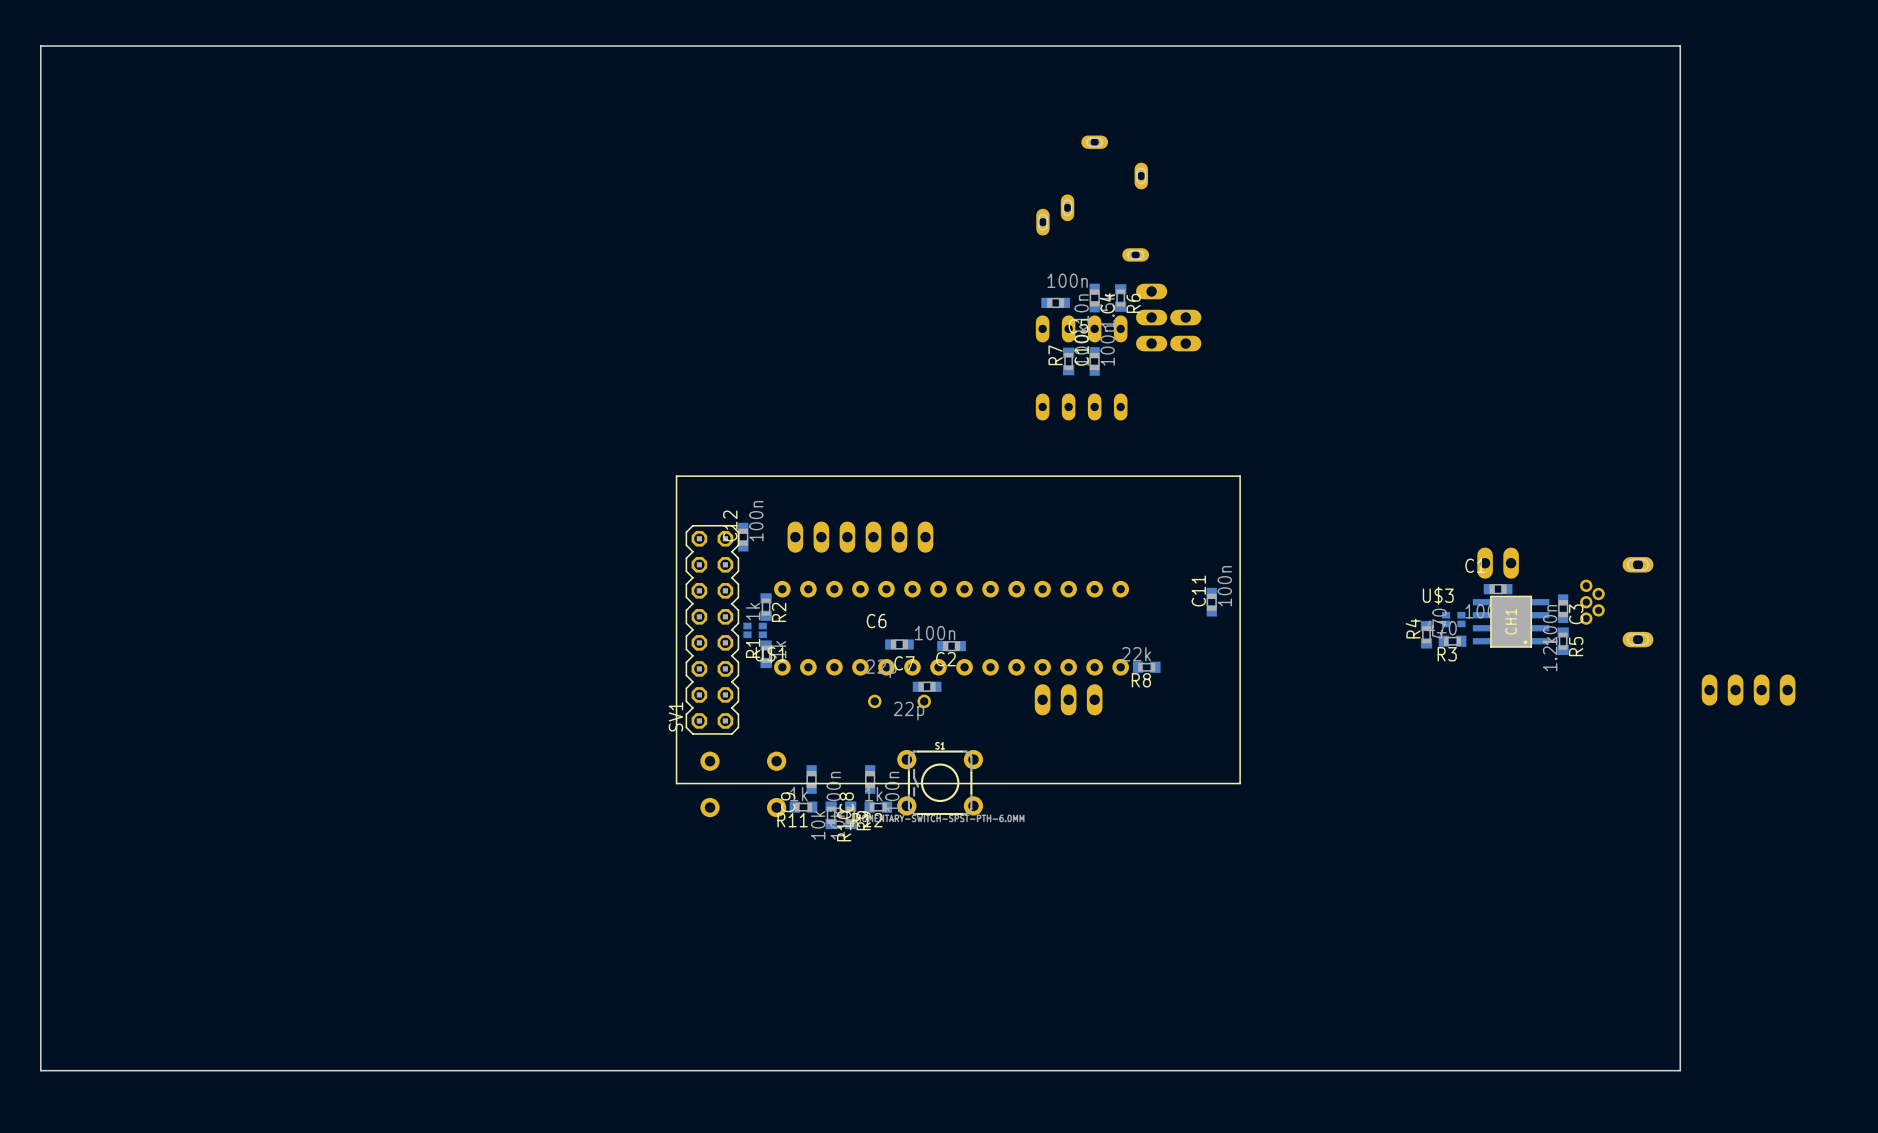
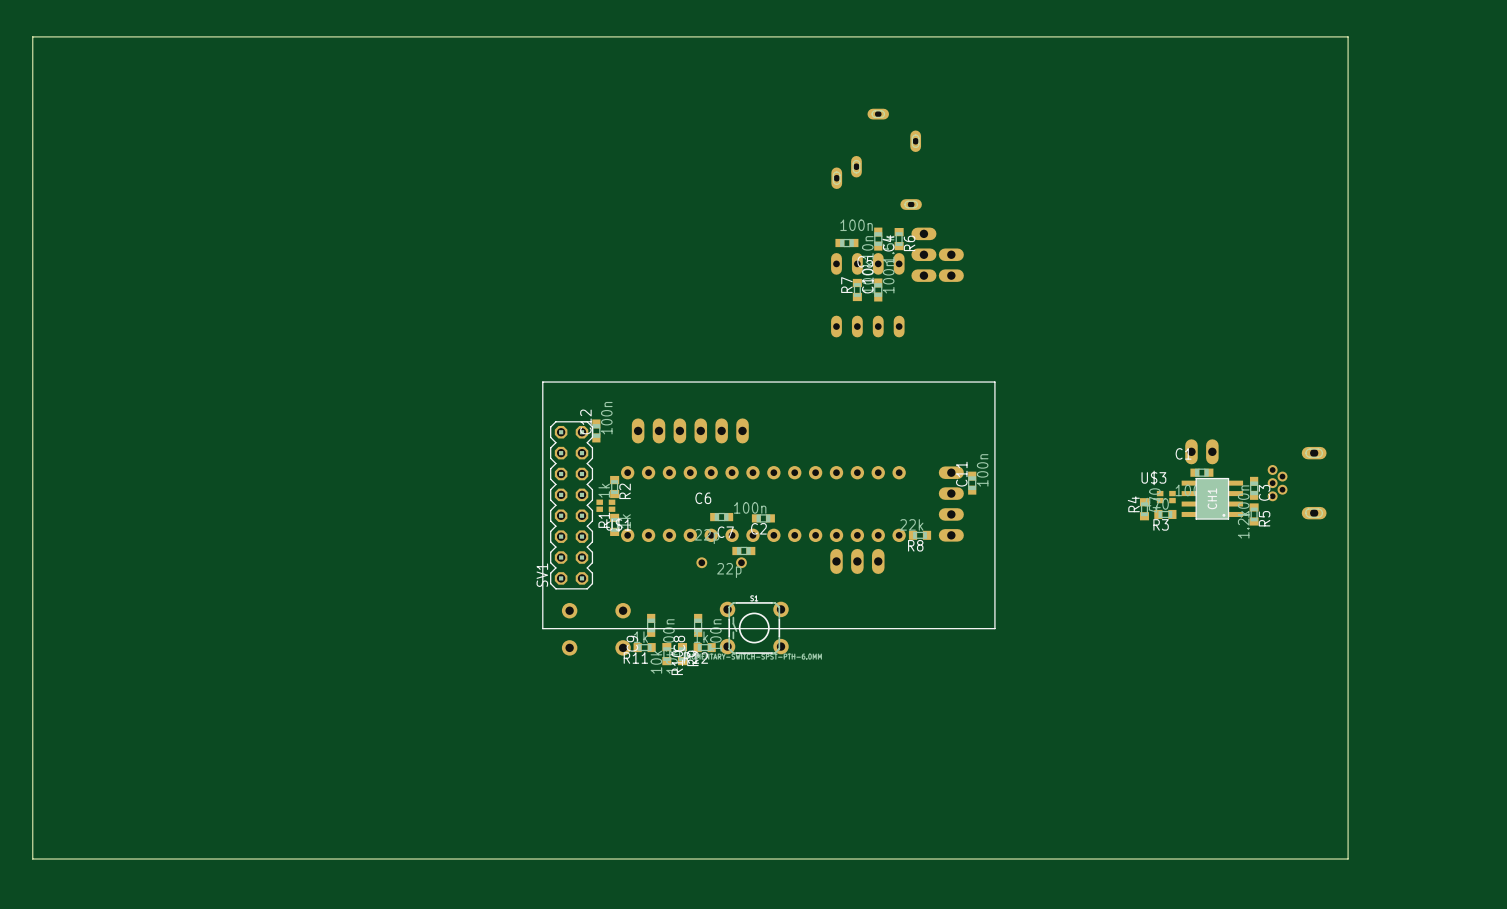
part: none -> (951, 504)
part: (1748, 690) -> none

